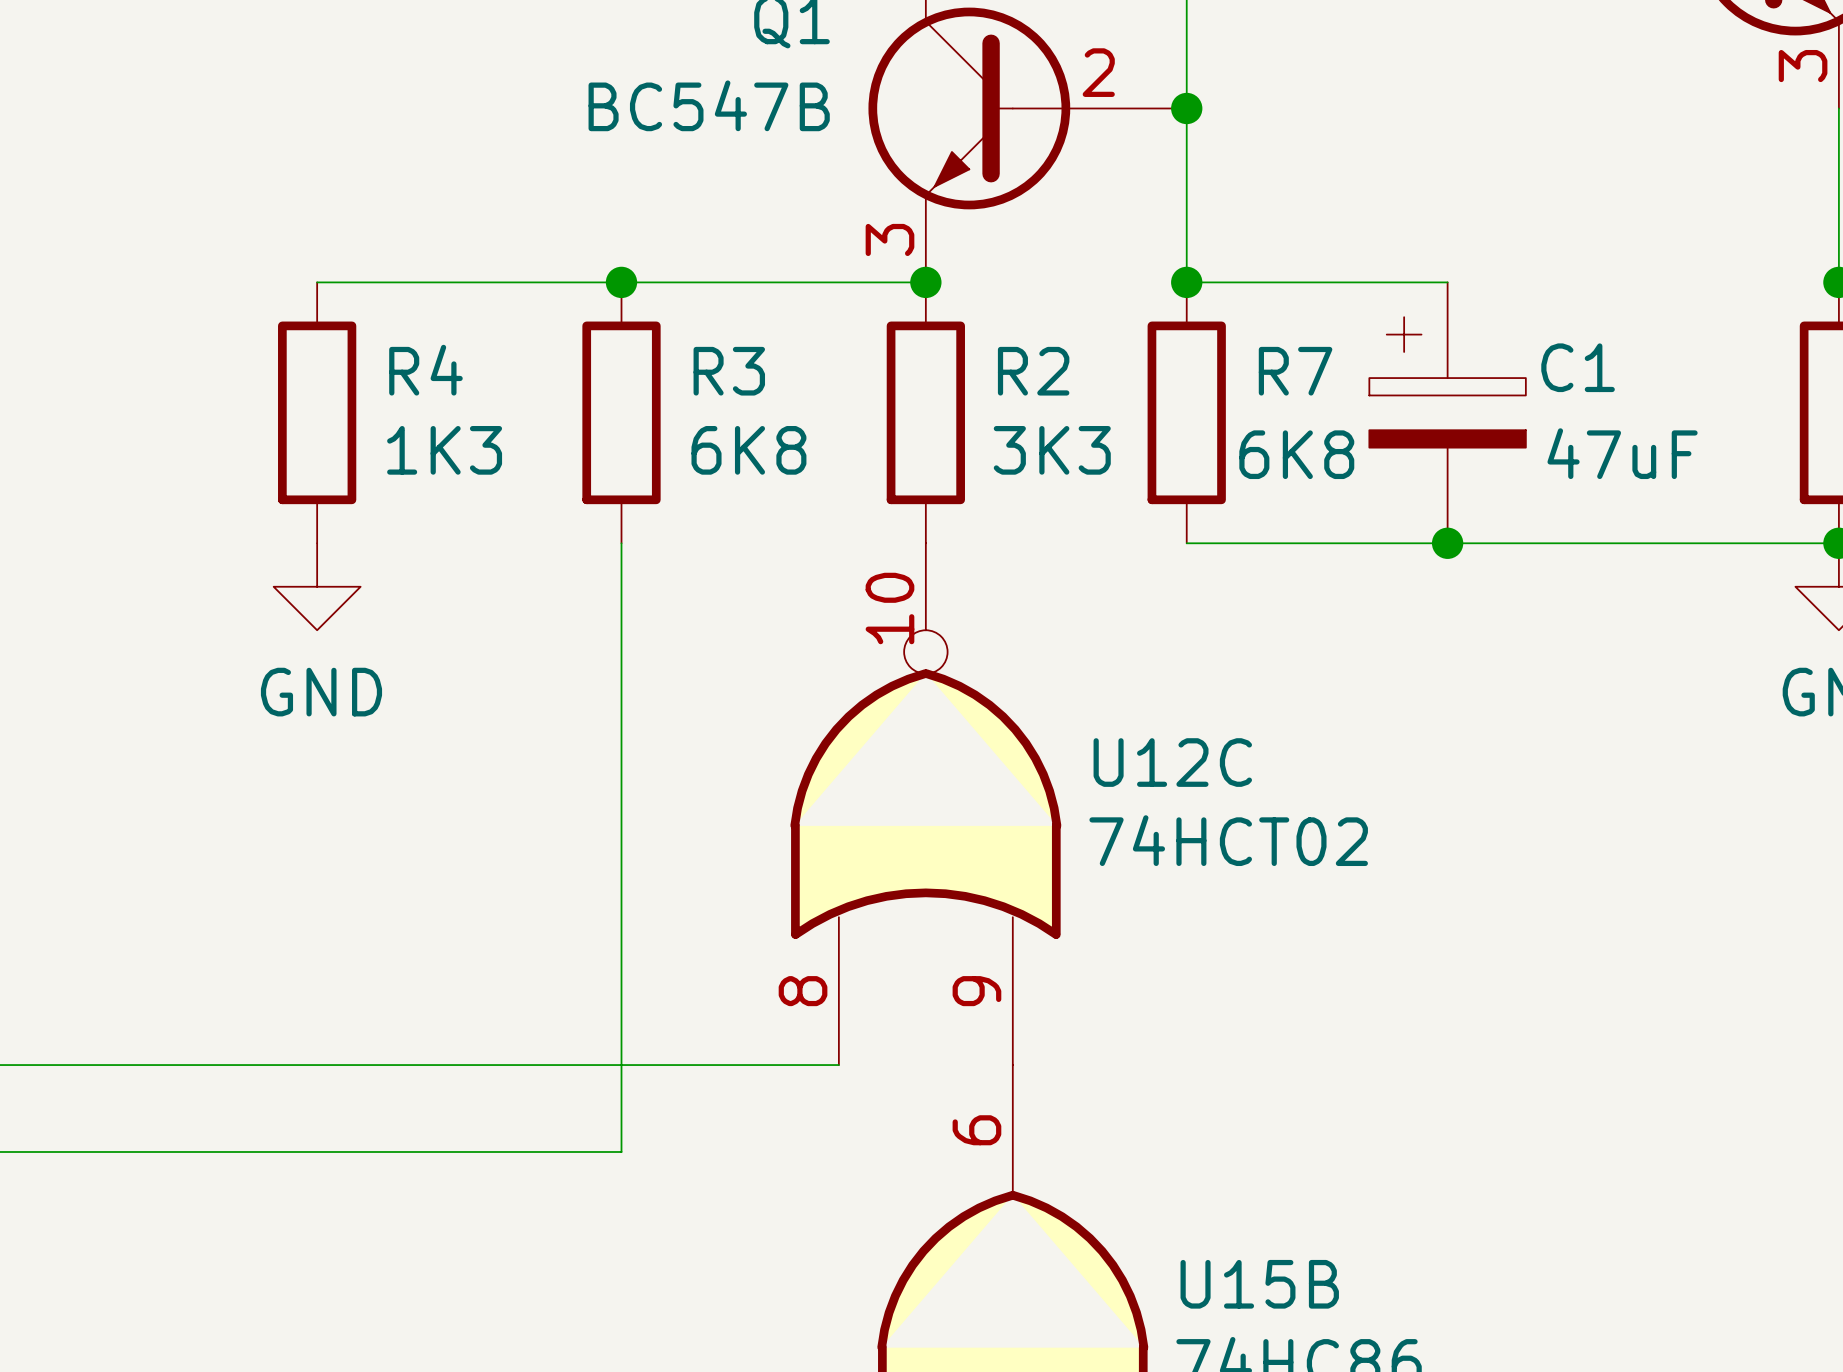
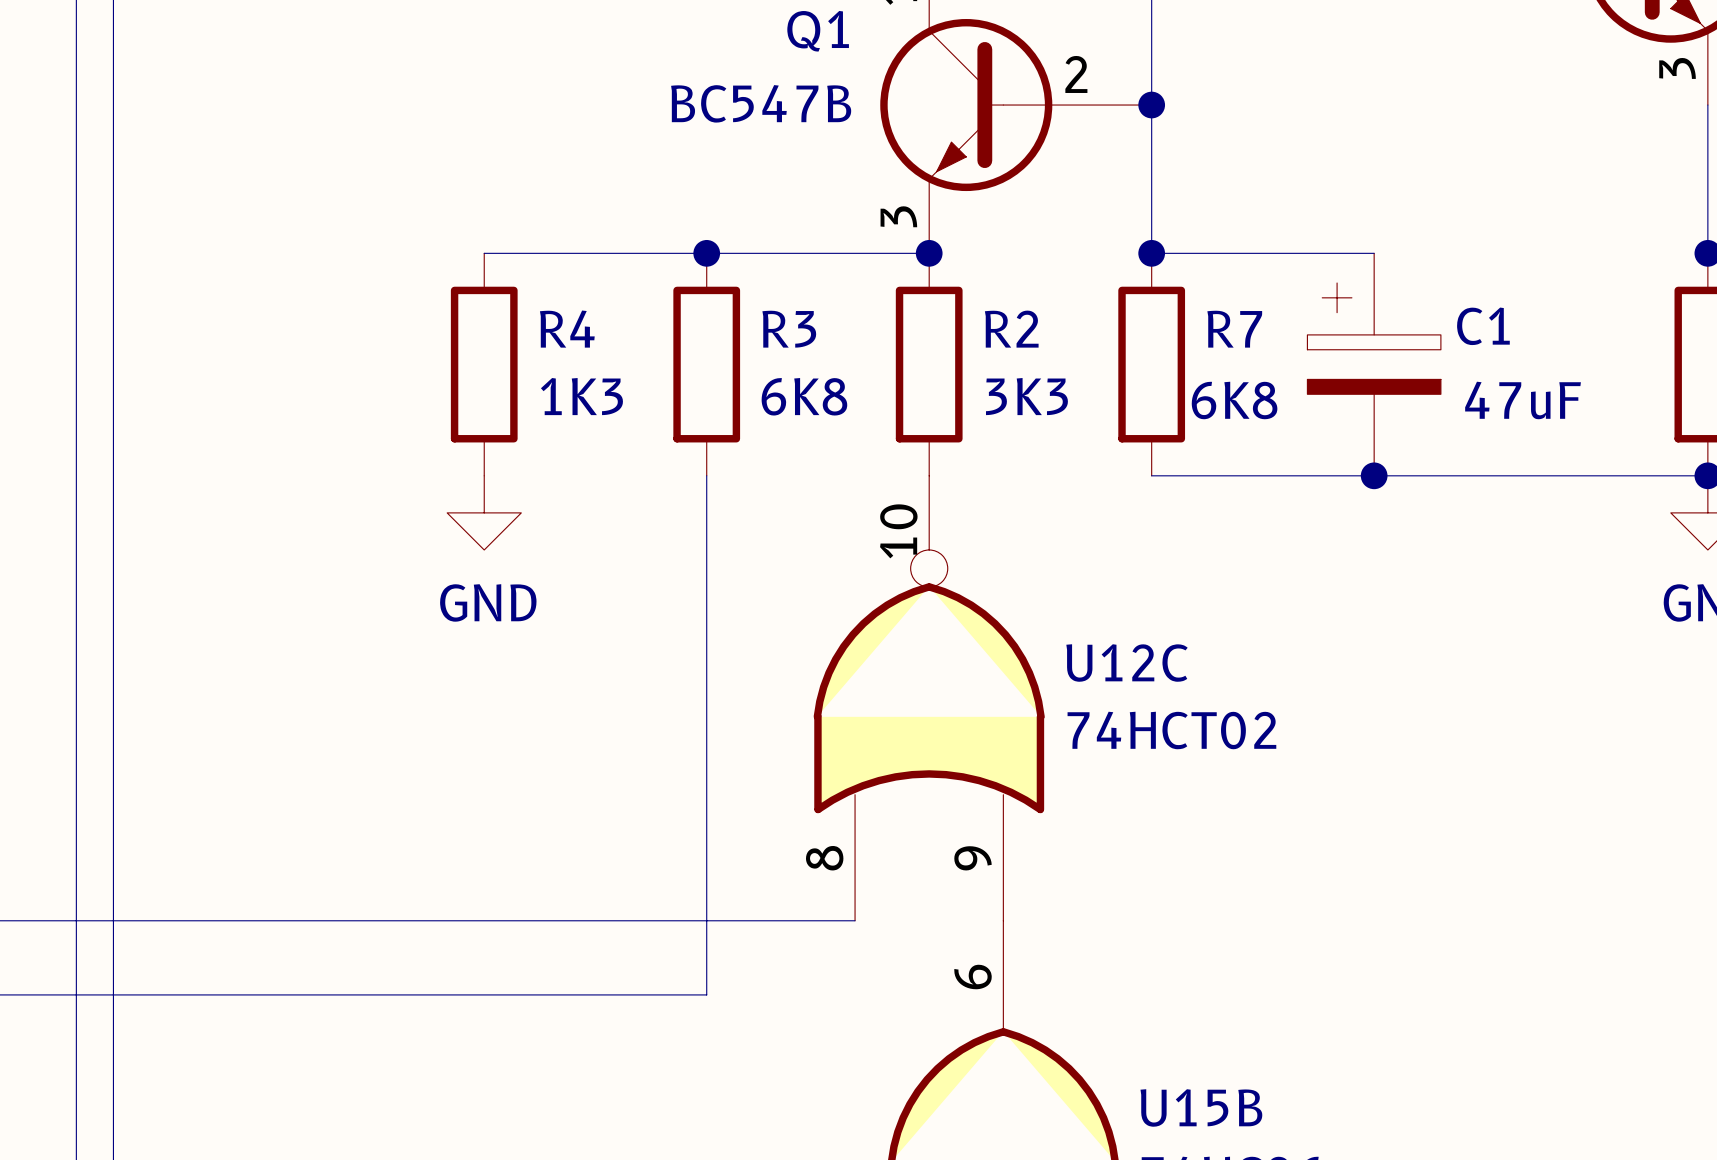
wire: (317, 282) (404, 282) -> none
junction position: (621, 282) -> (706, 253)
R4 position: (317, 412) -> (484, 364)
R3 position: (621, 412) -> (706, 364)
wire: (621, 543) (621, 1151) -> (706, 475) (706, 994) (669, 994)
power symbol position: GND (317, 586) -> GND (484, 512)

